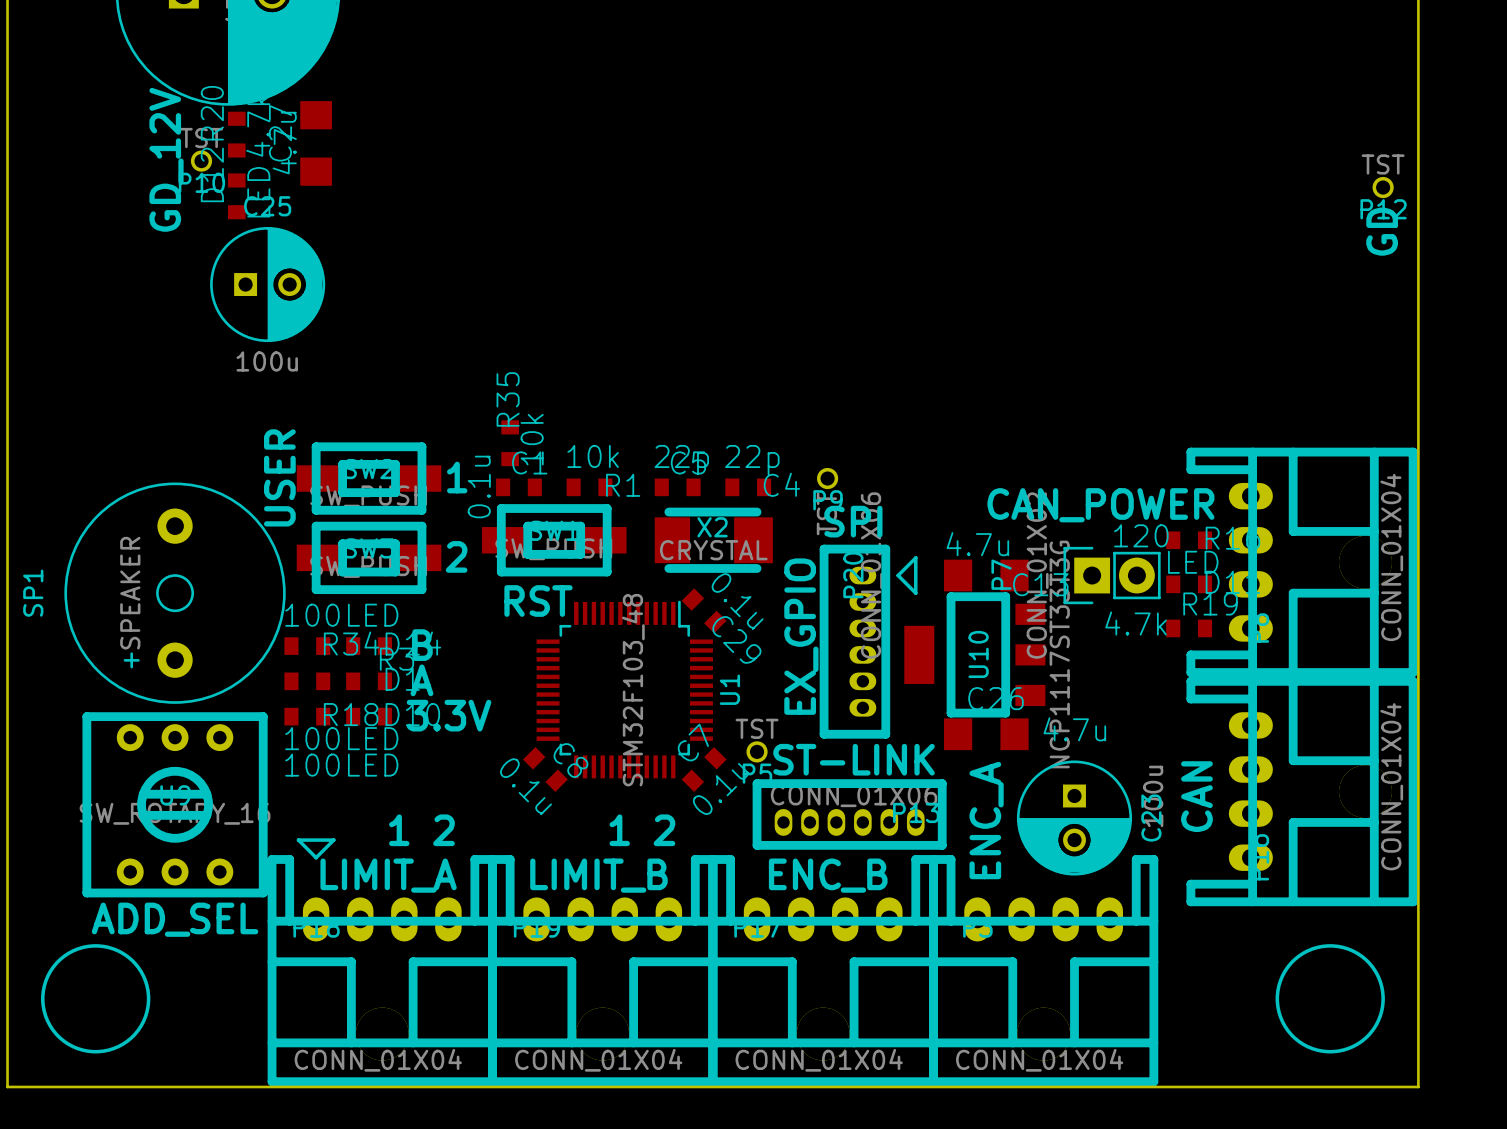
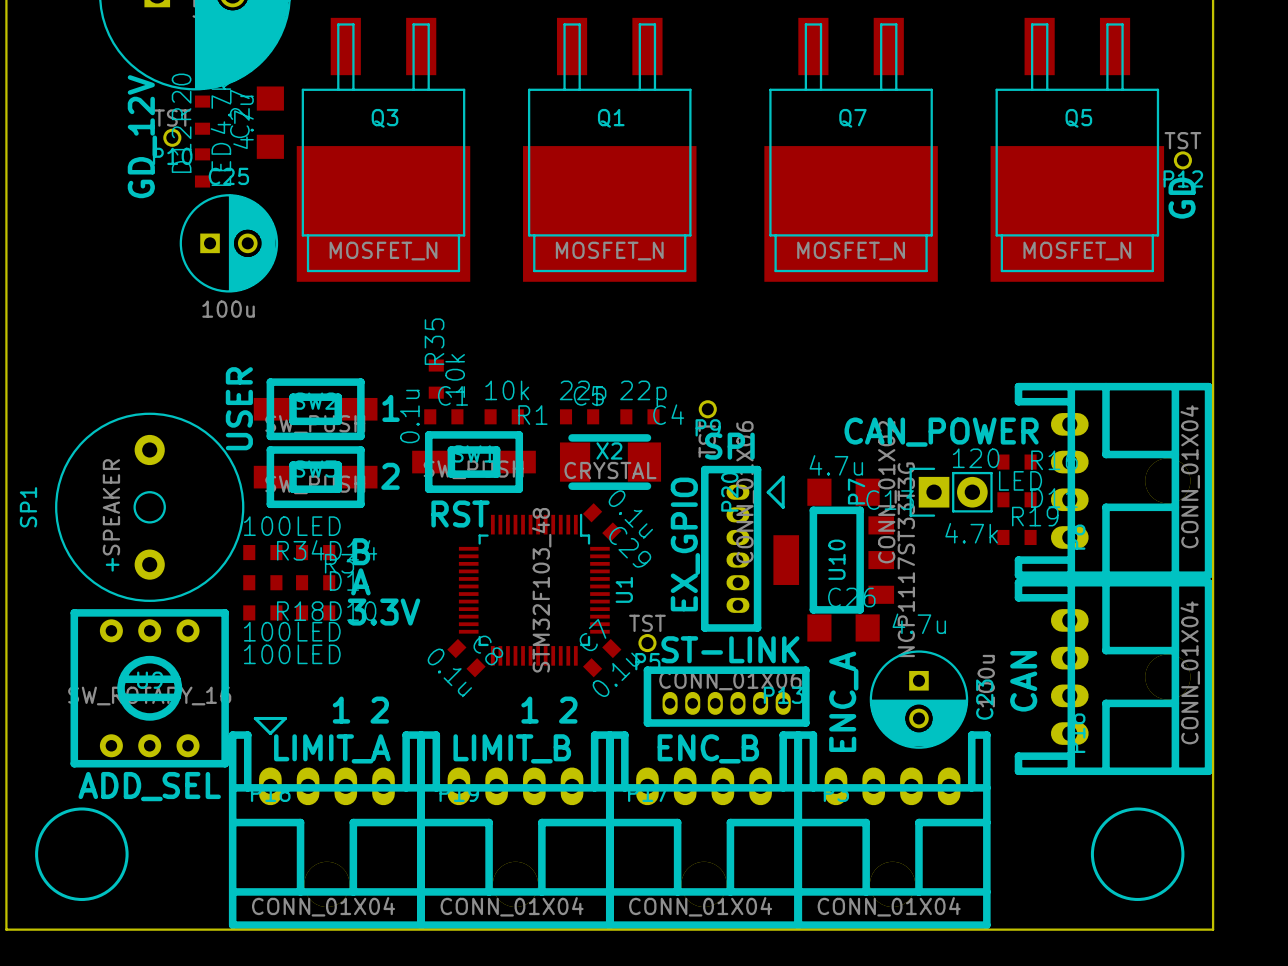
Q3: none -> MOSFET_N (383, 149)
Q1: none -> MOSFET_N (609, 149)
Q7: none -> MOSFET_N (851, 149)
Q5: none -> MOSFET_N (1077, 149)

